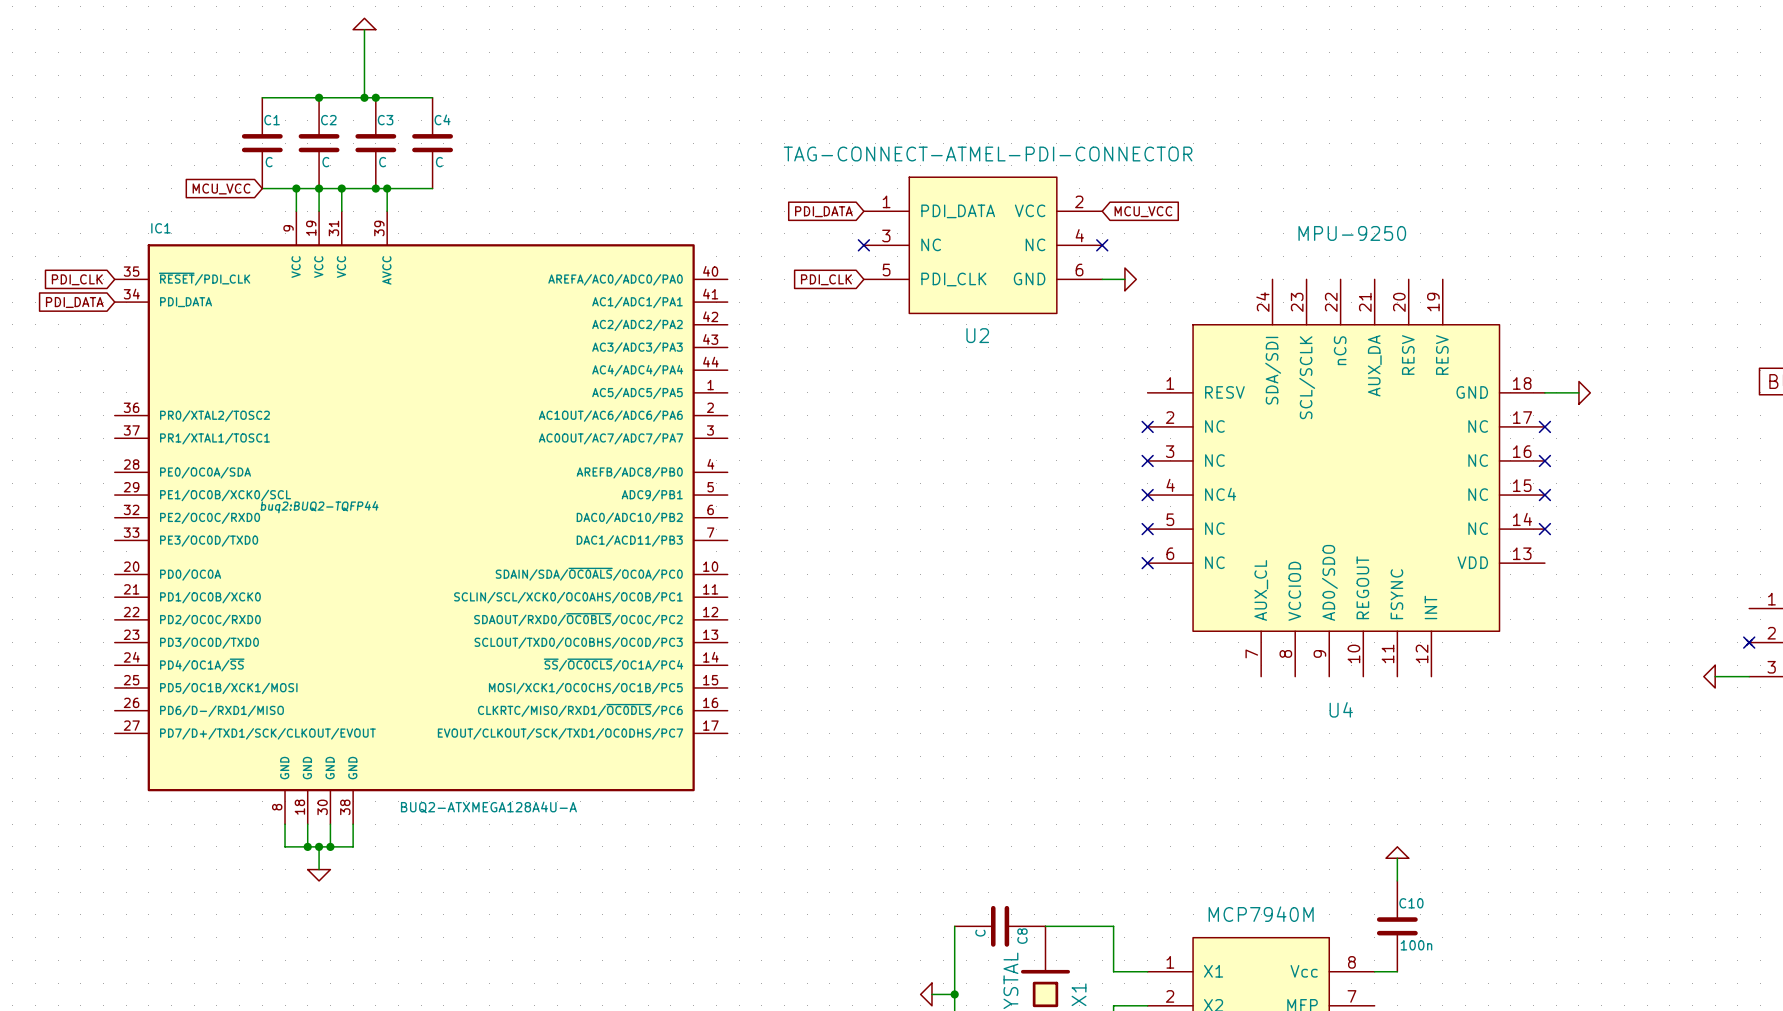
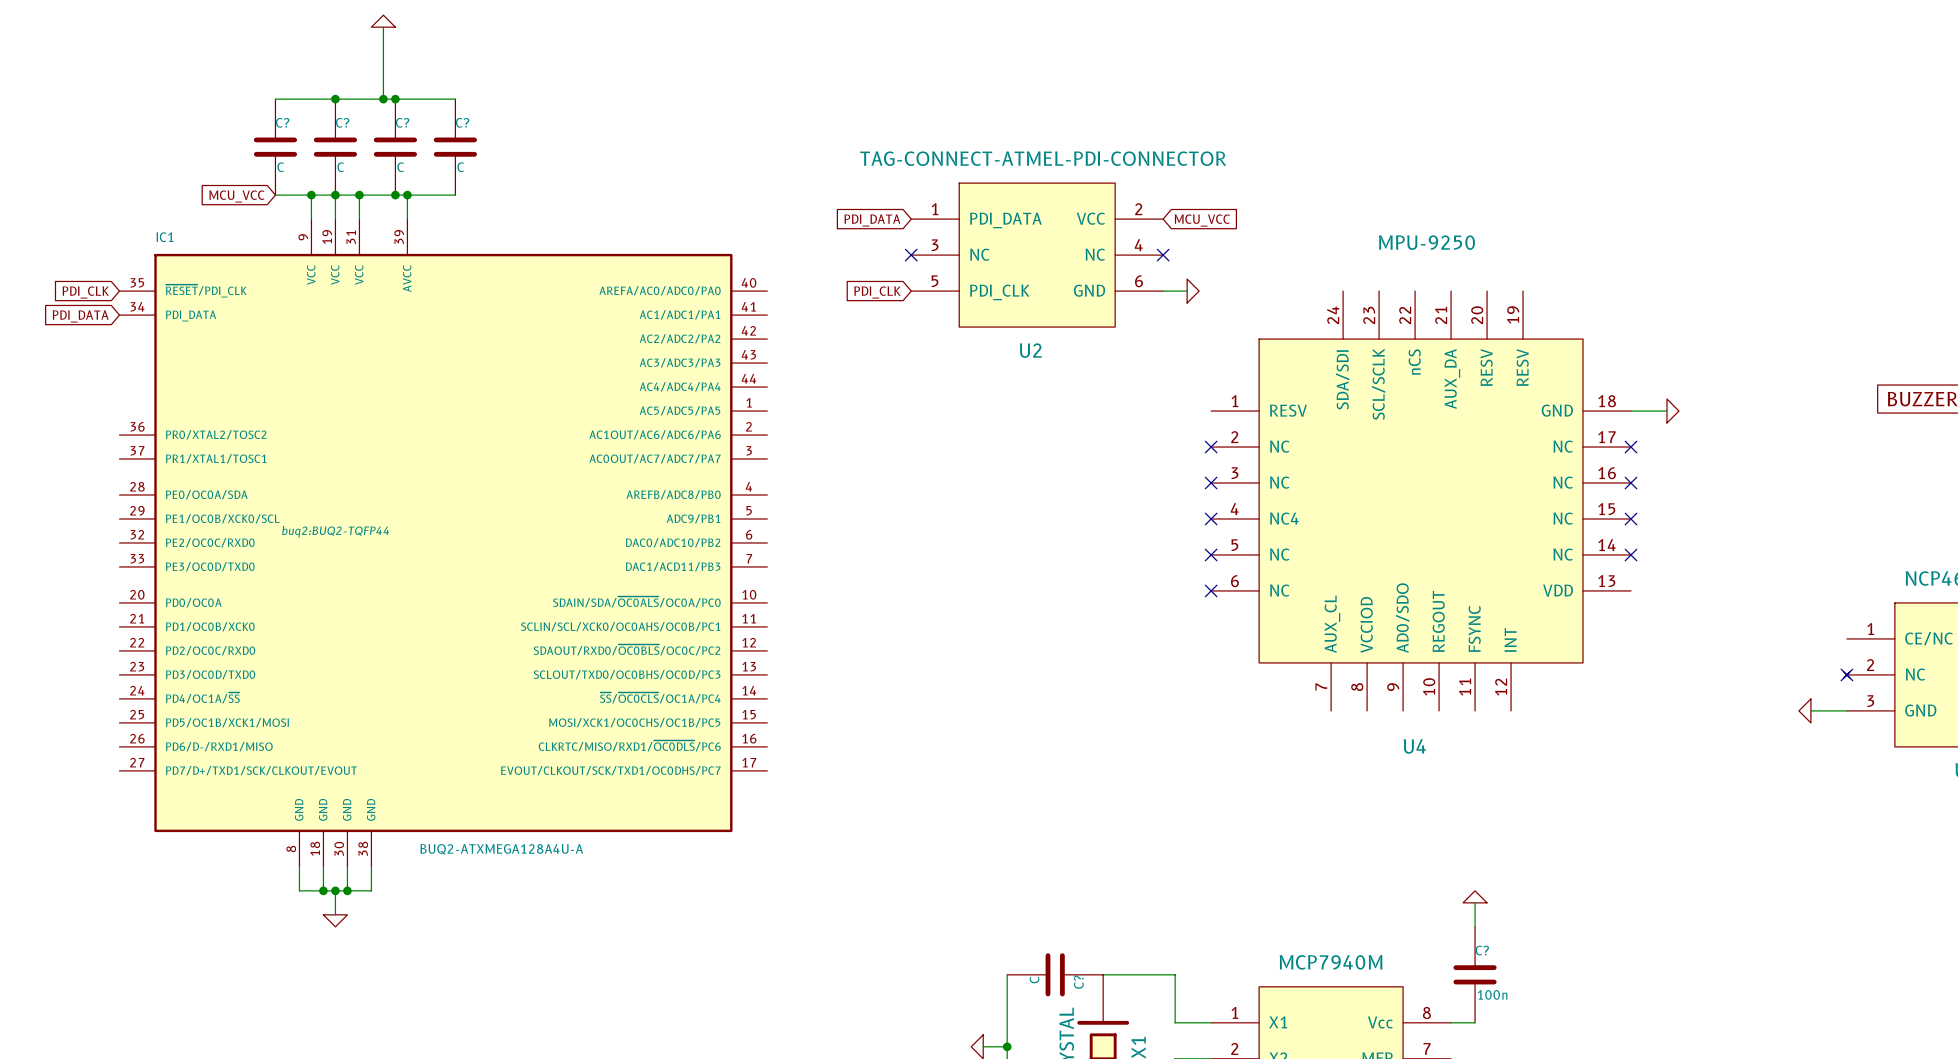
C4 name: C4 (442, 119) -> C? (462, 122)
C1 name: C1 (272, 120) -> C? (282, 122)
C2 name: C2 (328, 120) -> C? (342, 122)
C3 name: C3 (385, 120) -> C? (402, 122)
C10 name: C10 (1411, 903) -> C? (1482, 950)
C8 name: C8 (1022, 936) -> C? (1078, 982)

